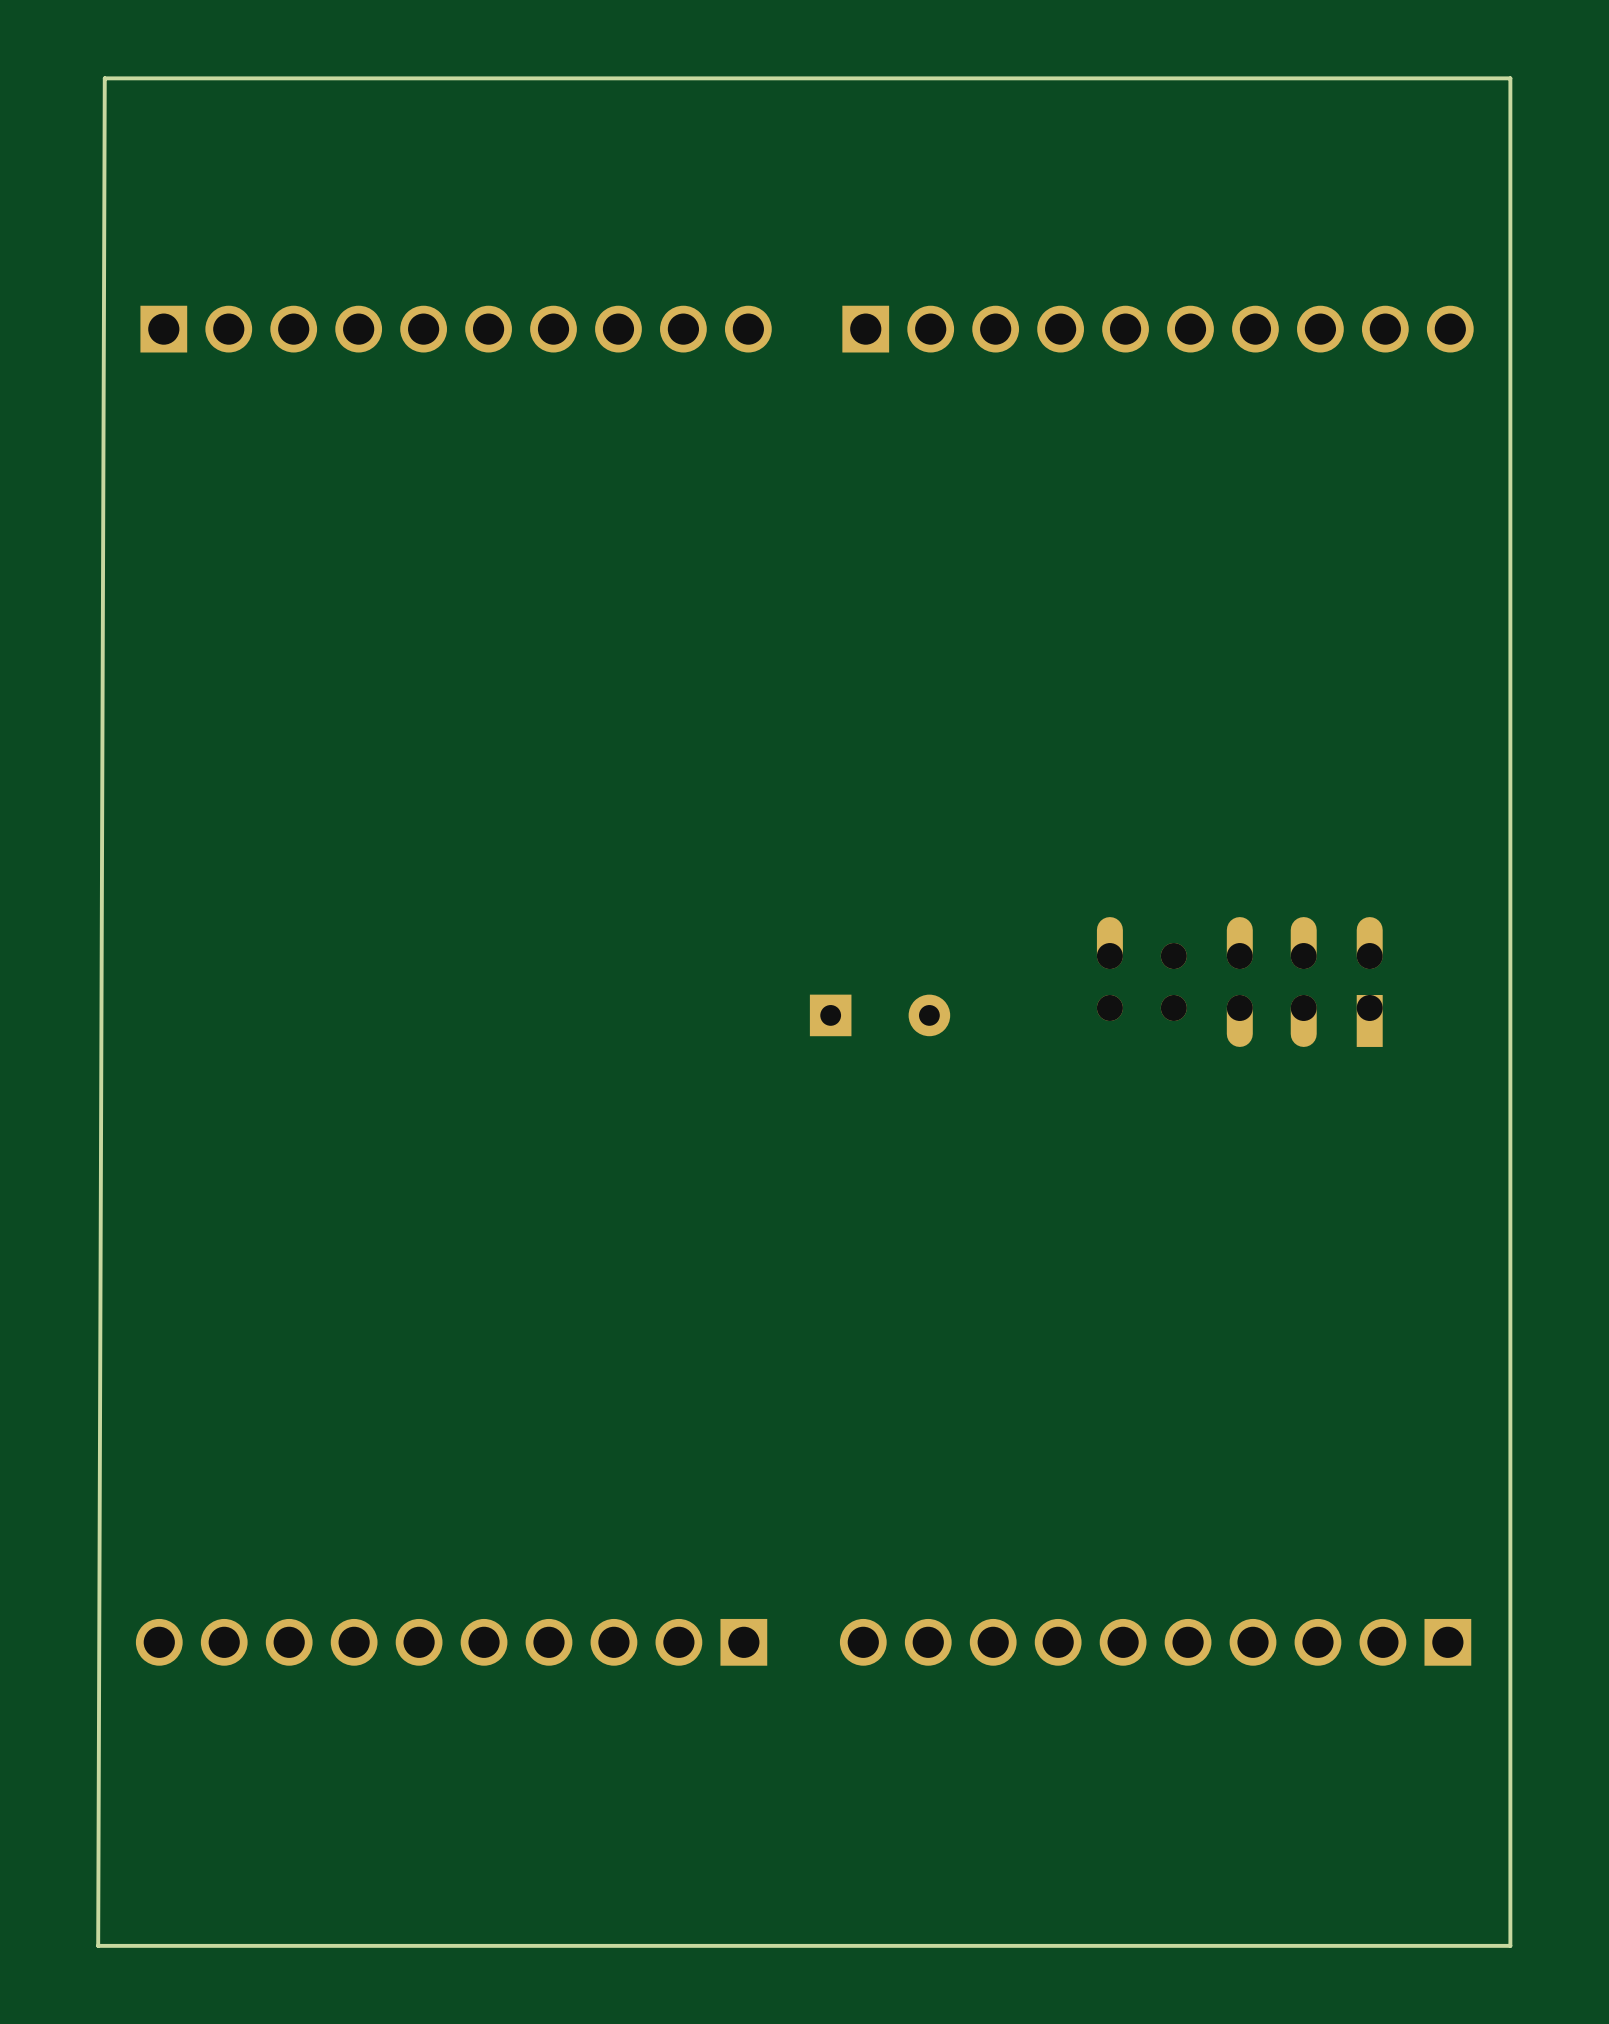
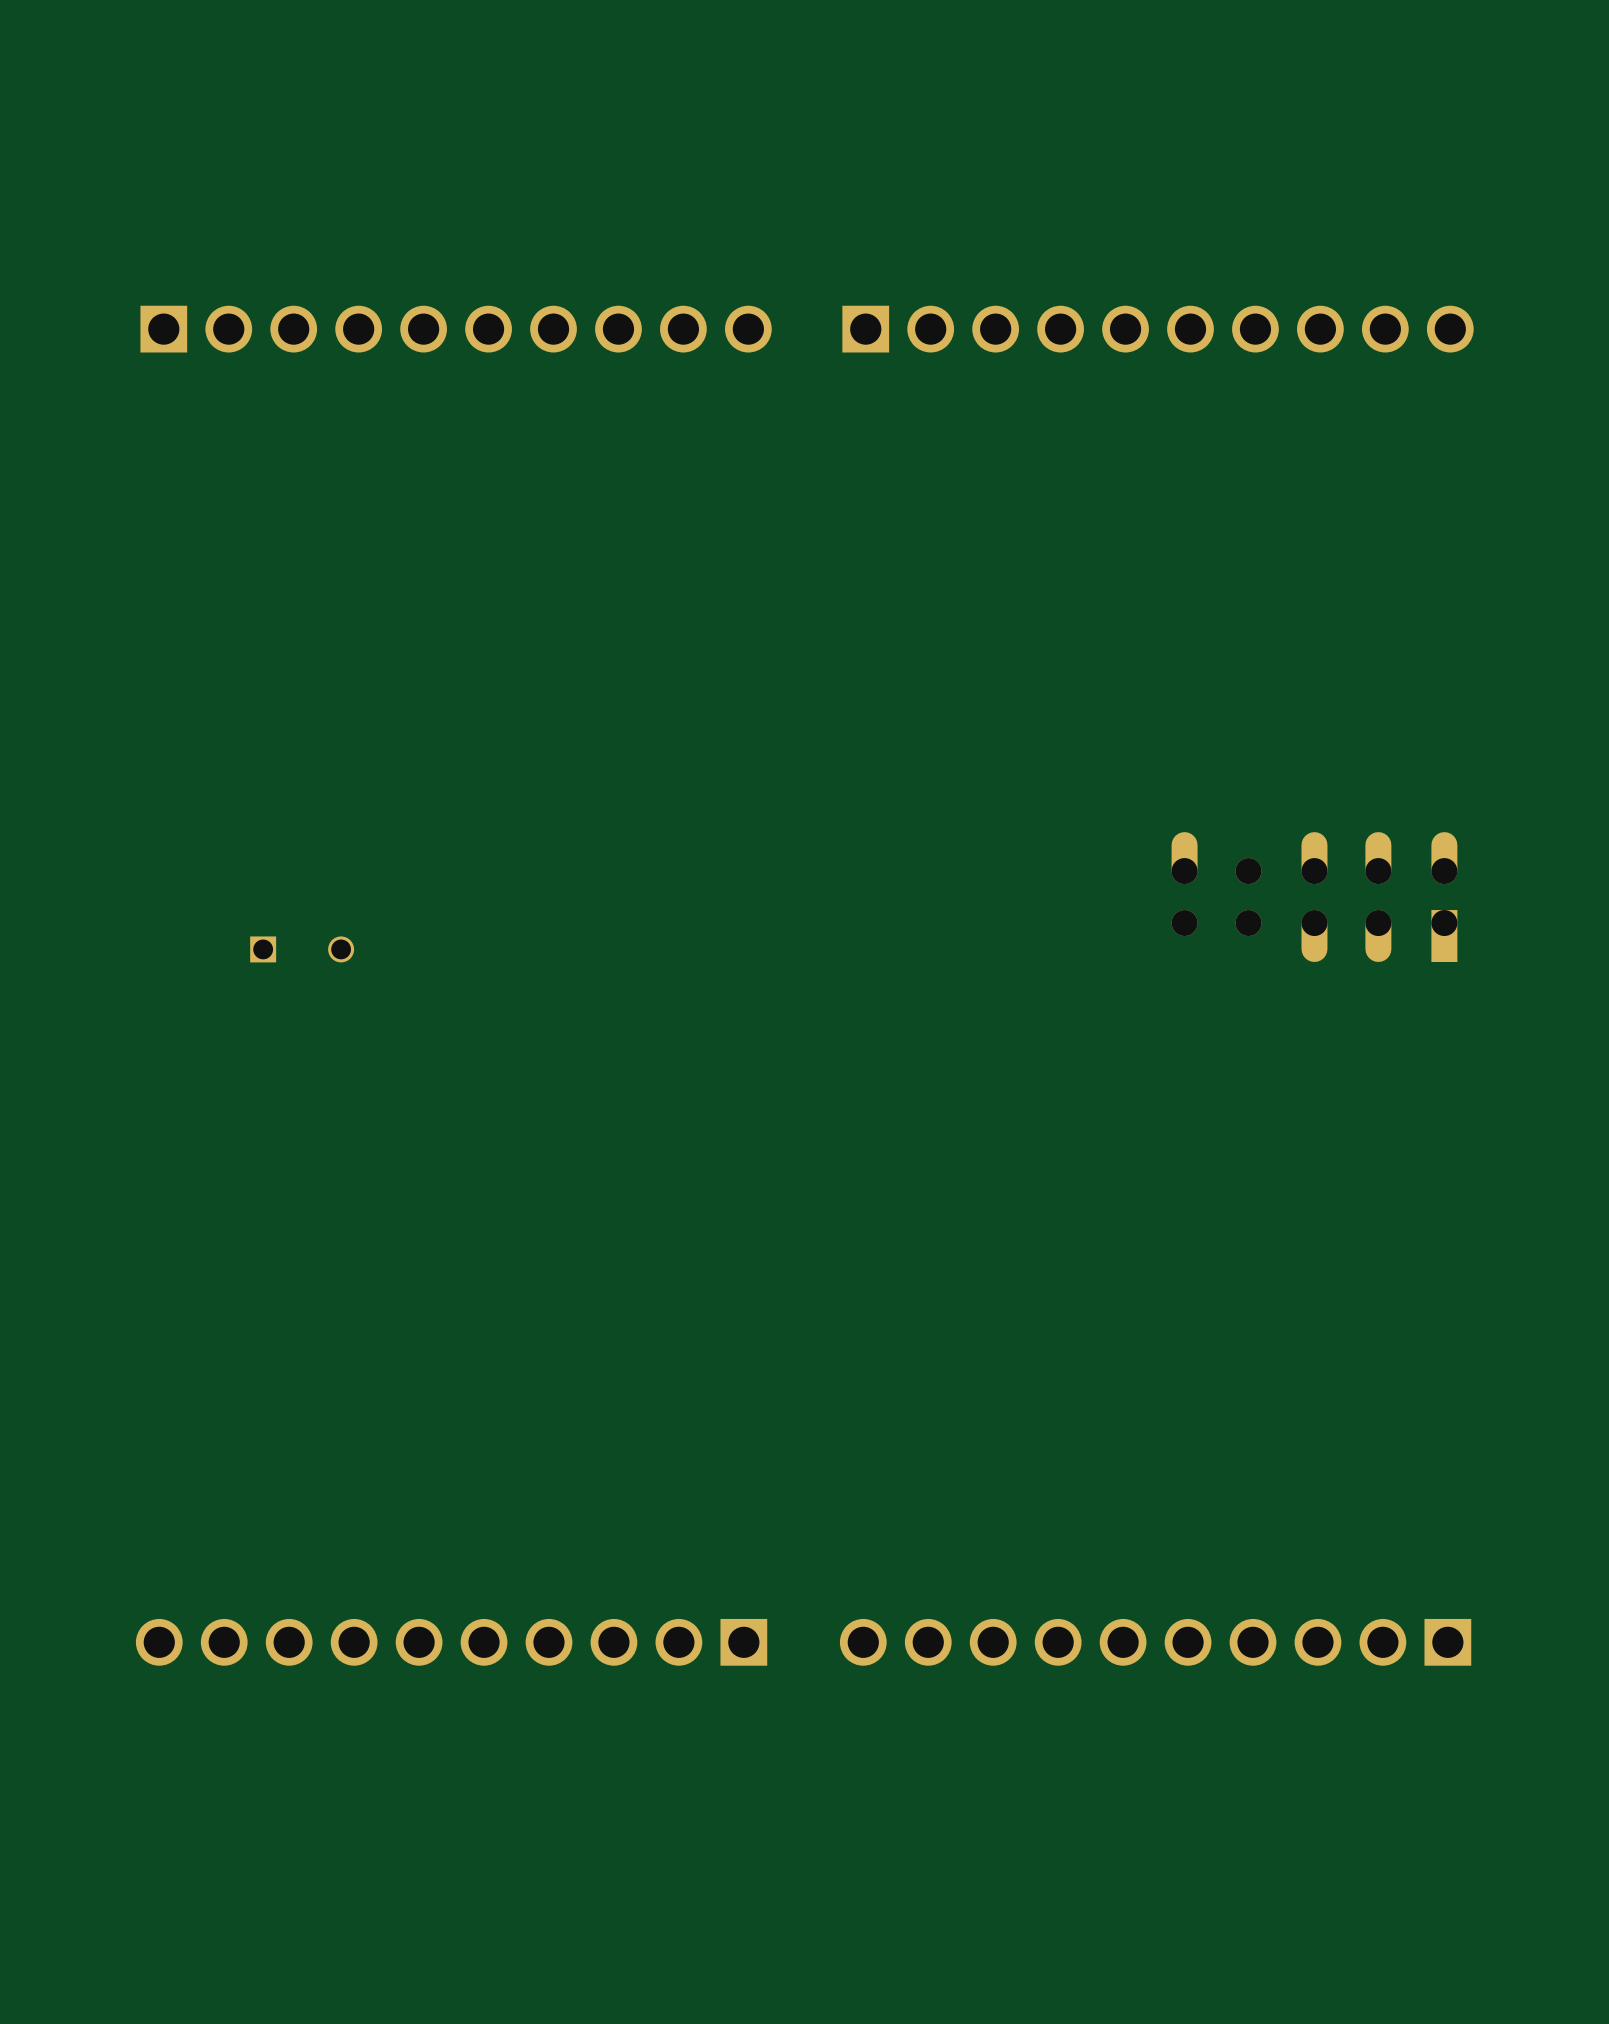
board edge: (1510, 78) (104, 78) (98, 1945) (1510, 1945) (1510, 78) -> none
part: none -> (302, 949)
part position: (1239, 982) -> (1314, 897)
part: (880, 1015) -> none

